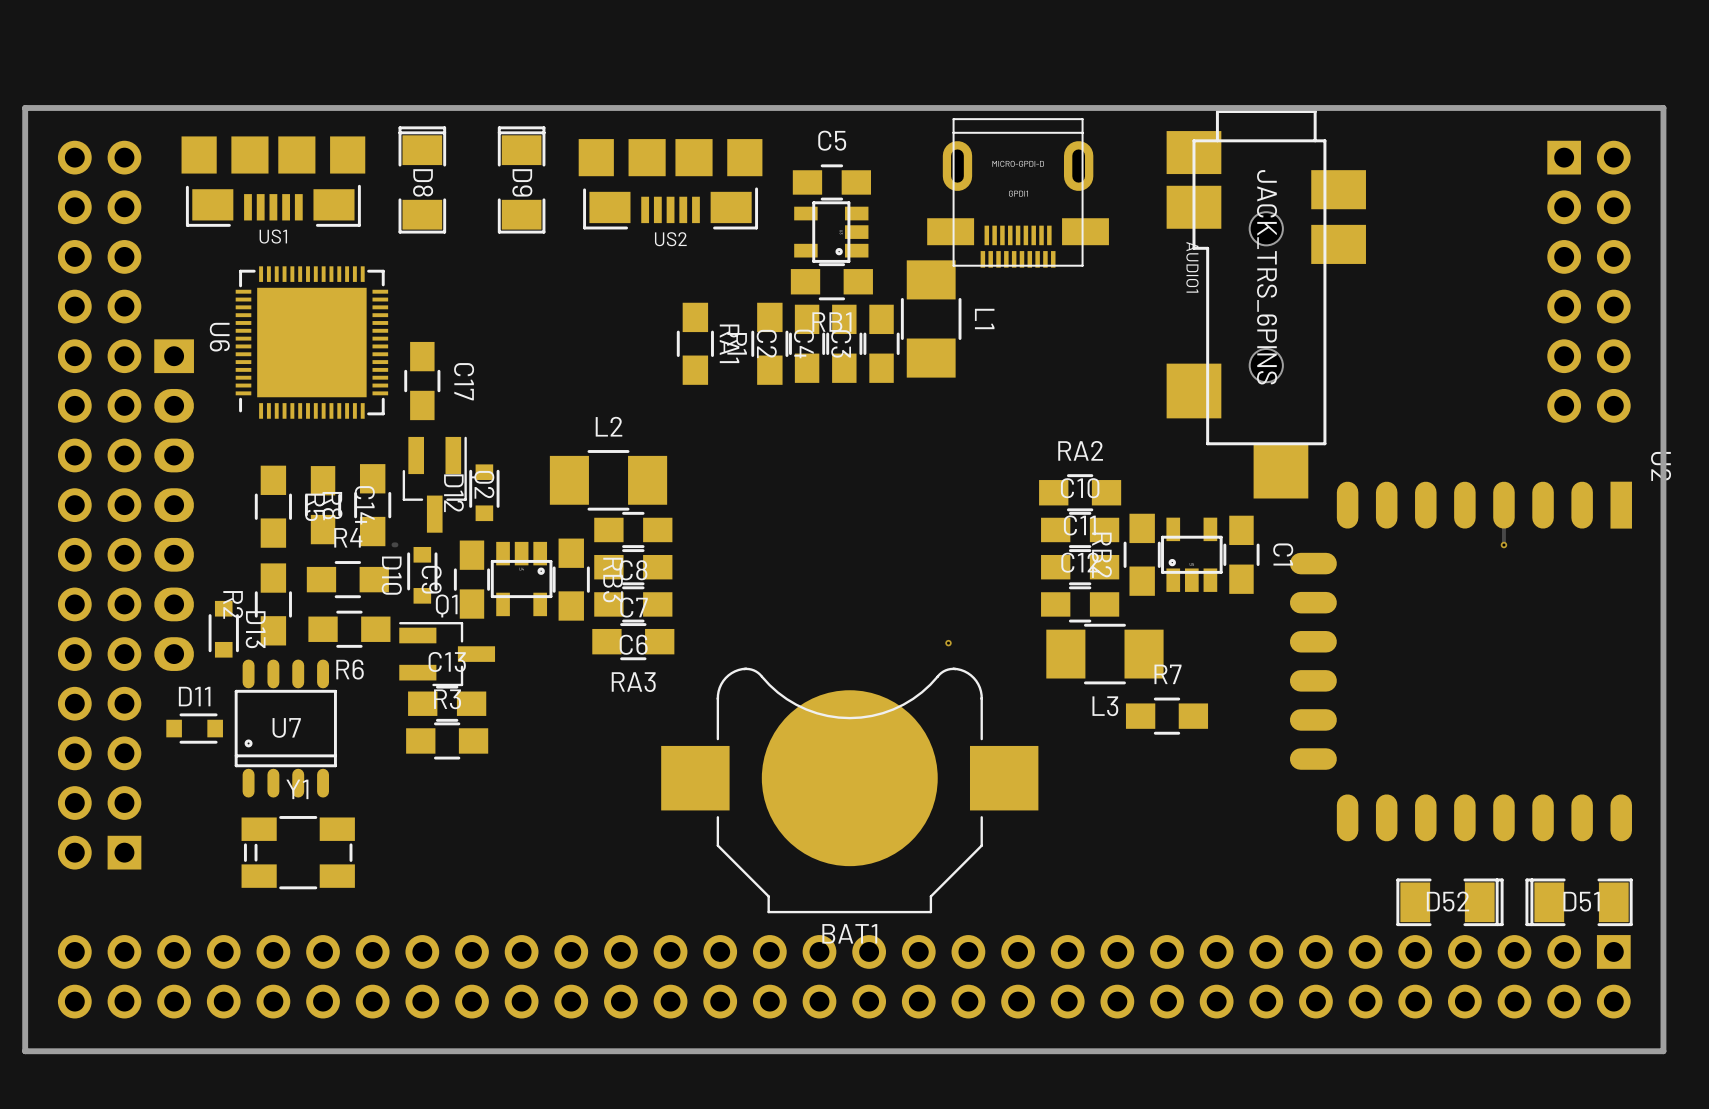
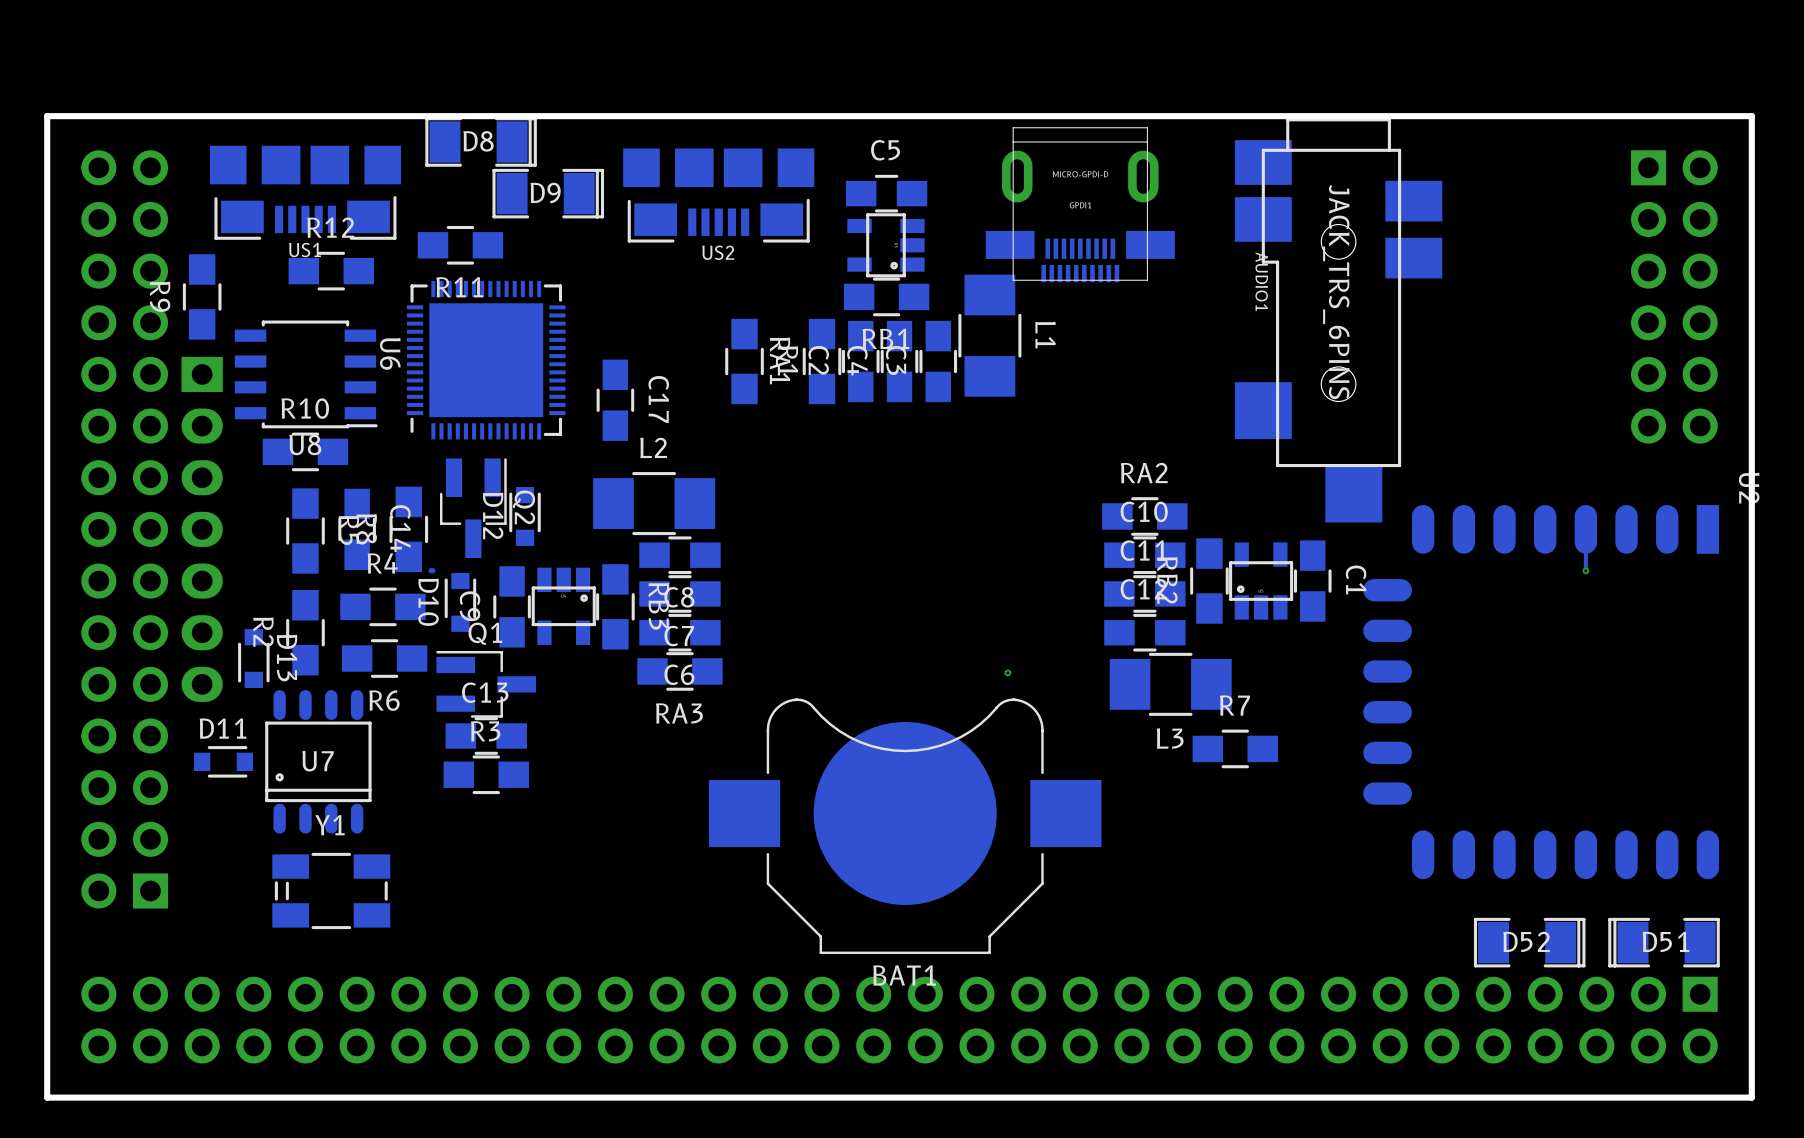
D8 rotation: 0° (422, 179) -> 90° clockwise (481, 141)
D9 rotation: 0° (521, 179) -> 90° clockwise (548, 193)
R11: none -> (460, 245)
R12: none -> (331, 271)
R9: none -> (202, 296)
U6 position: (311, 342) -> (486, 360)
U8: none -> (306, 374)
C17 position: (422, 381) -> (615, 400)
R10: none -> (305, 451)

